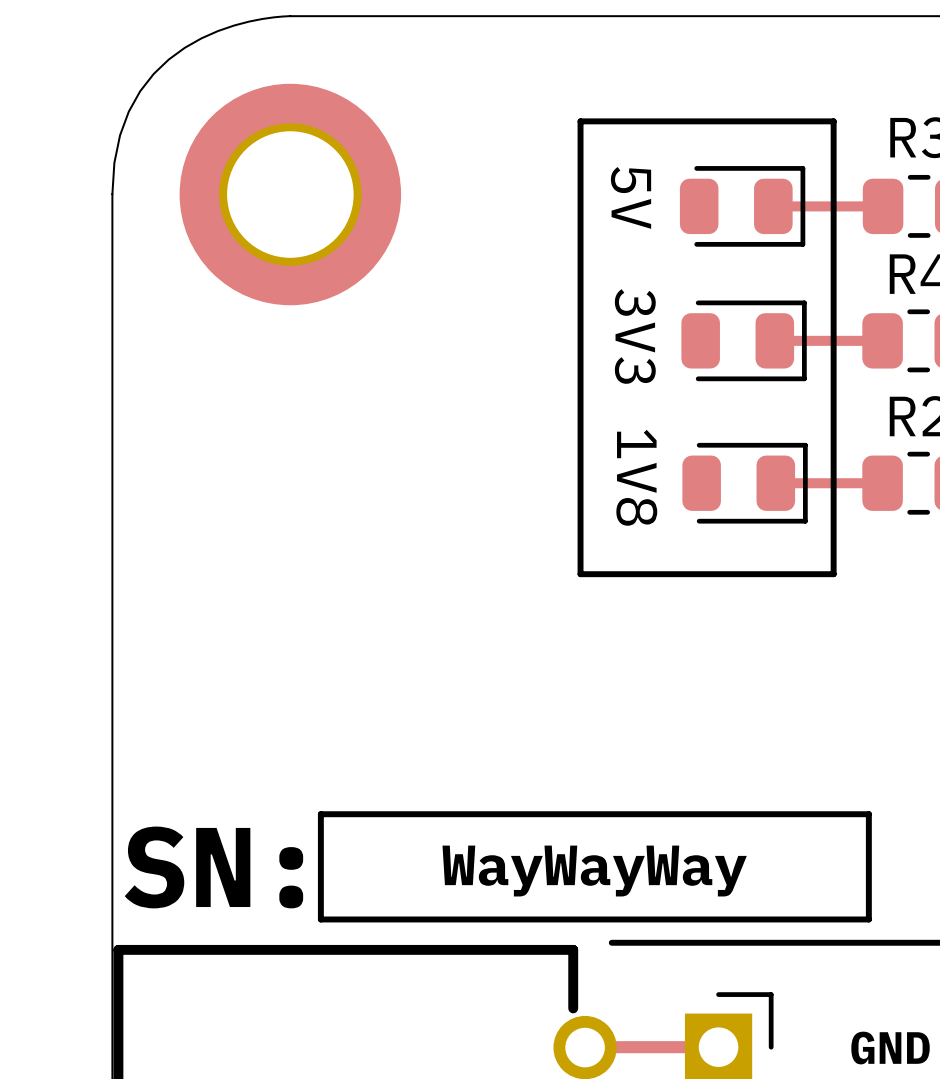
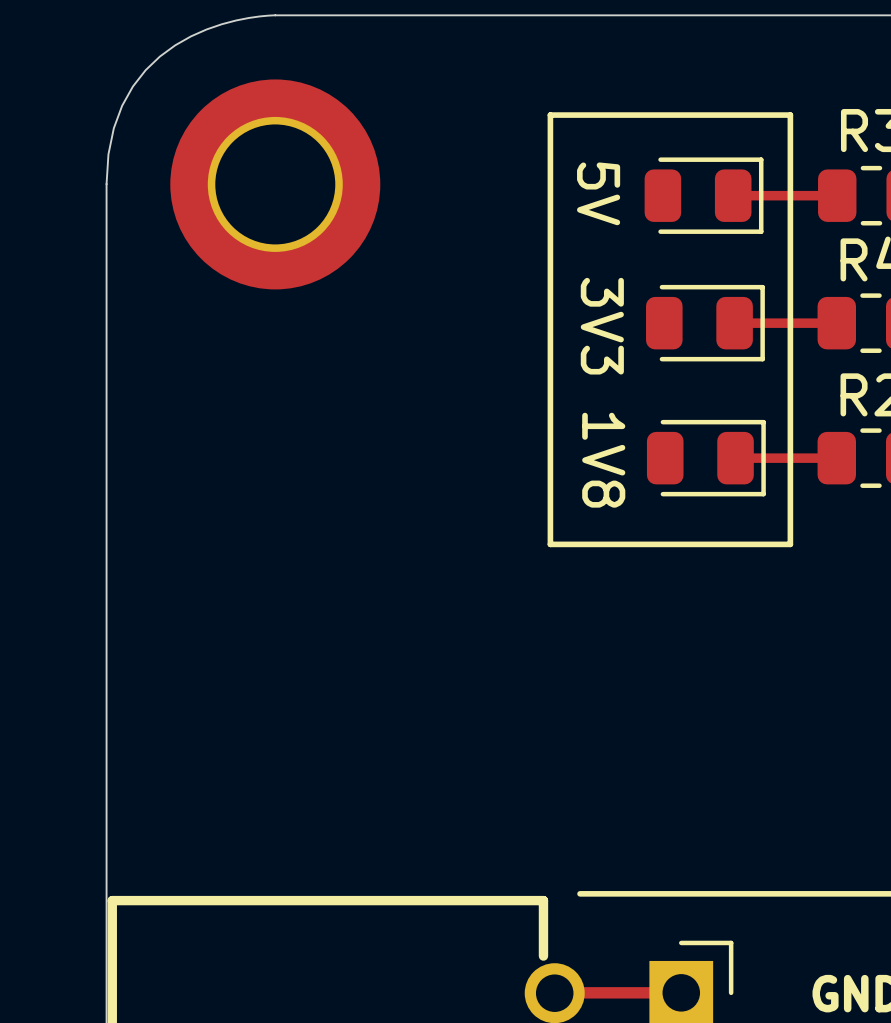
line: (320, 814) (868, 814) (868, 919) (320, 919) (320, 814) -> none
text: SN: (213, 867) -> none
text: WayWayWay (594, 871) -> none

